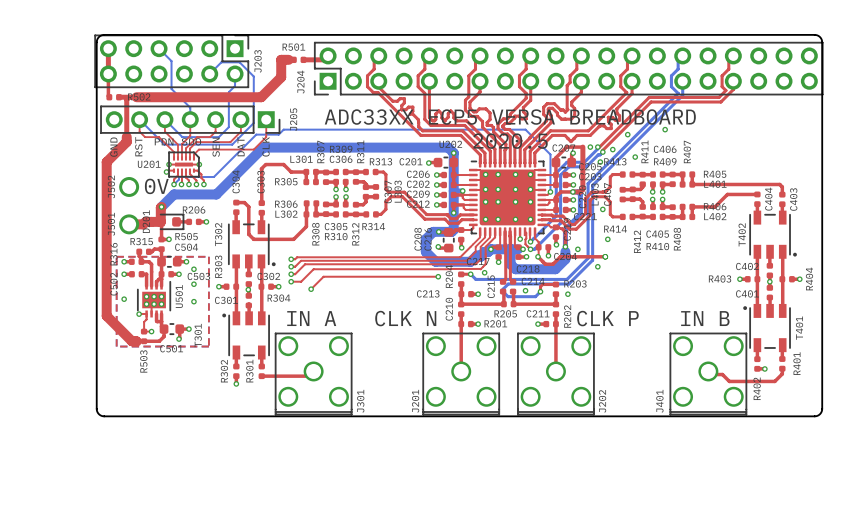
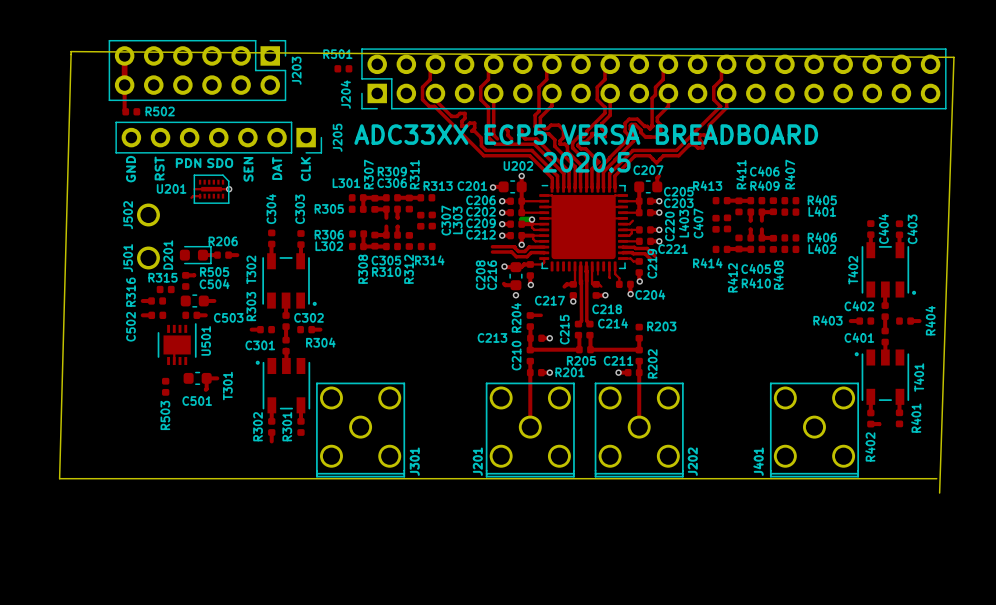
bottom track: (159, 48) (171, 61) (171, 88) (190, 107) (190, 119) -> none
top track: (328, 55) (324, 59) (303, 59) -> none
bottom track: (682, 55) (678, 60) (678, 69) (671, 75) (671, 86) (678, 93) -> none
top track: (733, 55) (728, 60) (728, 69) (722, 75) (722, 86) (725, 90) (719, 97) (649, 97) (597, 147) -> none
top track: (293, 59) (281, 59) (281, 77) (261, 97) (119, 97) -> none
bottom track: (209, 74) (221, 62) (239, 62) (253, 76) (253, 123) (232, 144) (164, 144) (139, 119) -> none
bottom track: (235, 74) (235, 85) (228, 92) (228, 127) (218, 137) (182, 137) (164, 119) -> none
bottom track: (682, 81) (682, 95) (592, 185) (592, 260) (568, 284) (508, 284) (503, 289) (508, 296) (535, 296) (540, 291) -> none
top track: (733, 81) (733, 89) (720, 102) (651, 102) (602, 152) -> none
bottom track: (678, 93) (588, 183) (588, 258) (566, 279) (475, 279) (470, 274) -> none
top track: (129, 97) (126, 99) (126, 142) (106, 162) (106, 316) (131, 341) (144, 341) -> none
top track: (438, 110) (435, 113) (435, 119) (432, 120) -> none
top track: (450, 110) (444, 120) -> none
top track: (139, 119) (139, 131) (145, 137) (159, 137) (174, 152) (174, 158) -> none
top track: (164, 119) (164, 131) (178, 144) (178, 158) -> none
top track: (190, 119) (190, 135) (181, 144) (181, 158) -> none
top track: (215, 119) (215, 131) (210, 137) (197, 137) (185, 148) (185, 158) -> none
top track: (240, 119) (240, 131) (230, 142) (196, 142) (189, 148) (189, 158) -> none
top track: (266, 119) (266, 137) (253, 149) (198, 149) (193, 154) (193, 158) -> none
via: (665, 129) -> none
via: (627, 134) -> none
via: (590, 147) -> none
bottom track: (597, 147) (584, 162) (566, 162) (556, 172) (556, 216) (530, 241) -> none
via: (597, 147) -> none
via: (612, 149) -> none
bottom track: (602, 152) (586, 166) (568, 166) (560, 175) (560, 223) (534, 249) (530, 249) -> none
via: (602, 152) -> none
via: (573, 153) -> none
via: (635, 157) -> none
top track: (555, 162) (555, 157) (566, 147) (582, 147) (582, 189) (580, 191) (560, 191) (556, 196) (556, 209) -> none
via: (600, 162) -> none
via: (169, 164) -> none
top track: (265, 164) (261, 169) -> none
top track: (266, 164) (283, 164) (291, 172) (306, 172) (306, 182) -> none
top track: (261, 169) (261, 203) -> none
top track: (178, 170) (174, 184) -> none
top track: (181, 170) (181, 184) -> none
top track: (185, 170) (188, 184) -> none
top track: (189, 170) (189, 174) (196, 180) (196, 184) -> none
top track: (193, 170) (197, 170) (201, 174) (203, 184) -> none
via: (166, 172) -> none
top track: (375, 172) (383, 172) (385, 174) (385, 189) (388, 192) (404, 192) (428, 214) -> none
via: (485, 174) -> none
via: (498, 174) -> none
via: (515, 174) -> none
via: (530, 174) -> none
top track: (622, 174) (612, 174) (610, 177) (610, 186) (605, 191) (591, 192) (585, 198) (585, 213) (574, 224) (569, 222) -> none
top track: (662, 174) (682, 174) (682, 184) -> none
top track: (692, 174) (692, 184) (779, 184) (782, 186) (782, 194) -> none
top track: (356, 181) (363, 181) (365, 187) (375, 186) -> none
bottom track: (174, 184) (179, 177) (213, 177) (256, 134) (278, 134) (283, 129) (525, 129) (550, 154) (550, 191) -> none
via: (174, 184) -> none
via: (181, 184) -> none
via: (188, 184) -> none
via: (196, 184) -> none
via: (203, 184) -> none
top track: (642, 184) (640, 189) (622, 189) -> none
text: 0V (156, 186) -> none
via: (336, 189) -> none
via: (346, 189) -> none
via: (485, 189) -> none
via: (498, 189) -> none
via: (515, 189) -> none
via: (530, 189) -> none
via: (550, 191) -> none
bottom track: (572, 191) (577, 191) (580, 194) (580, 214) (565, 229) (565, 259) (555, 269) (515, 269) (510, 264) (510, 249) -> none
via: (572, 191) -> none
via: (652, 191) -> none
via: (662, 191) -> none
top track: (757, 194) (727, 194) (715, 206) (692, 206) (692, 216) -> none
via: (336, 196) -> none
via: (346, 196) -> none
top track: (375, 196) (365, 196) (365, 201) (363, 204) (356, 204) -> none
top track: (622, 199) (639, 199) (642, 201) (642, 206) -> none
via: (652, 199) -> none
via: (662, 199) -> none
via: (485, 201) -> none
via: (498, 201) -> none
via: (515, 201) -> none
via: (530, 201) -> none
top track: (236, 202) (244, 202) (248, 206) (248, 234) (253, 239) (293, 239) (306, 226) (306, 203) -> none
top track: (161, 206) (160, 221) -> none
bottom track: (161, 206) (174, 194) (216, 194) (263, 147) (448, 147) (453, 153) (453, 229) (451, 231) (433, 231) (425, 239) (425, 251) (435, 261) (470, 261) (476, 255) (480, 256) (484, 252) (488, 252) (490, 249) (523, 249) -> none
via: (161, 206) -> none
top track: (682, 206) (682, 216) (662, 216) -> none
via: (602, 209) -> none
top track: (345, 214) (366, 214) -> none
top track: (375, 214) (380, 214) (385, 209) (385, 201) (391, 196) (402, 196) (424, 219) (428, 219) -> none
top track: (622, 216) (612, 216) (610, 214) (610, 201) (605, 196) (593, 196) (590, 200) (590, 215) (576, 229) (569, 229) (566, 225) -> none
via: (485, 219) -> none
via: (498, 219) -> none
via: (515, 219) -> none
via: (530, 219) -> none
top track: (160, 221) (161, 239) -> none
top track: (160, 221) (129, 224) -> none
via: (206, 221) -> none
top track: (555, 227) (562, 228) (565, 231) (565, 246) -> none
top track: (480, 231) (480, 237) (460, 257) (297, 257) (291, 259) -> none
top track: (485, 231) (485, 237) (475, 246) (475, 251) (466, 260) (301, 260) (295, 266) (291, 266) -> none
top track: (490, 231) (490, 237) (480, 246) (480, 259) (475, 264) (305, 264) (295, 274) (291, 274) -> none
top track: (495, 231) (495, 237) (485, 246) (485, 264) (480, 269) (313, 269) (301, 281) (291, 281) -> none
top track: (525, 231) (525, 244) (530, 249) -> none
via: (169, 239) -> none
via: (520, 239) -> none
via: (607, 239) -> none
via: (530, 241) -> none
via: (438, 246) -> none
via: (565, 246) -> none
top track: (538, 247) (538, 256) (545, 264) (552, 264) (560, 256) (605, 256) -> none
via: (490, 249) -> none
via: (523, 249) -> none
via: (530, 249) -> none
via: (577, 249) -> none
top track: (139, 251) (141, 261) (149, 261) (151, 264) (151, 286) -> none
top track: (148, 251) (161, 249) (161, 286) -> none
top track: (757, 251) (757, 310) -> none
top track: (782, 251) (782, 310) -> none
top zone outline: (116, 256) (116, 346) (208, 346) (208, 256) (116, 256) -> none
via: none -> (515, 295)
via: (538, 256) -> none
via: (605, 256) -> none
via: (291, 259) -> none
via: (124, 261) -> none
via: (186, 261) -> none
top track: (236, 261) (236, 318) -> none
top track: (261, 261) (261, 318) -> none
via: (291, 266) -> none
via: (597, 266) -> none
via: (193, 269) -> none
via: (484, 272) -> none
via: (124, 274) -> none
top track: (141, 274) (146, 274) (146, 286) -> none
via: (179, 274) -> none
via: (291, 274) -> none
via: (470, 274) -> none
top track: (438, 276) (323, 276) (311, 289) -> none
via: (438, 276) -> none
top track: (161, 279) (156, 281) (156, 286) -> none
via: (739, 279) -> none
via: (799, 279) -> none
via: (291, 281) -> none
via: (769, 281) -> none
via: (193, 284) -> none
top track: (555, 284) (542, 284) (540, 286) (540, 291) -> none
via: (218, 286) -> none
via: (278, 286) -> none
via: (248, 289) -> none
via: (311, 289) -> none
via: (525, 290) -> none
via: (540, 291) -> none
via: (567, 294) -> none
via: (146, 296) -> none
via: (154, 296) -> none
via: (161, 296) -> none
via: (124, 299) -> none
via: (193, 301) -> none
via: (146, 304) -> none
via: (154, 304) -> none
via: (161, 304) -> none
top track: (156, 313) (156, 320) (161, 321) -> none
top track: (161, 313) (164, 336) (159, 341) (144, 341) -> none
top track: (139, 314) (146, 313) (144, 331) (151, 331) -> none
via: (139, 314) -> none
text: IN A (311, 318) -> none
text: CLK N (405, 318) -> none
text: CLK P (607, 318) -> none
text: IN B (705, 318) -> none
via: (188, 329) -> none
via: (151, 331) -> none
via: (179, 339) -> none
via: (764, 368) -> none
top track: (782, 368) (782, 373) (774, 381) (729, 381) (722, 374) (708, 374) -> none
top track: (313, 371) (308, 376) (261, 376) -> none
via: (236, 383) -> none
board edge: (104, 416) (98, 414) (96, 408) (96, 42) (98, 37) (104, 34) (818, 35) (822, 42) (822, 408) (820, 414) (814, 416) -> (119, 478) (59, 478) (71, 51) (953, 57) (939, 493)

